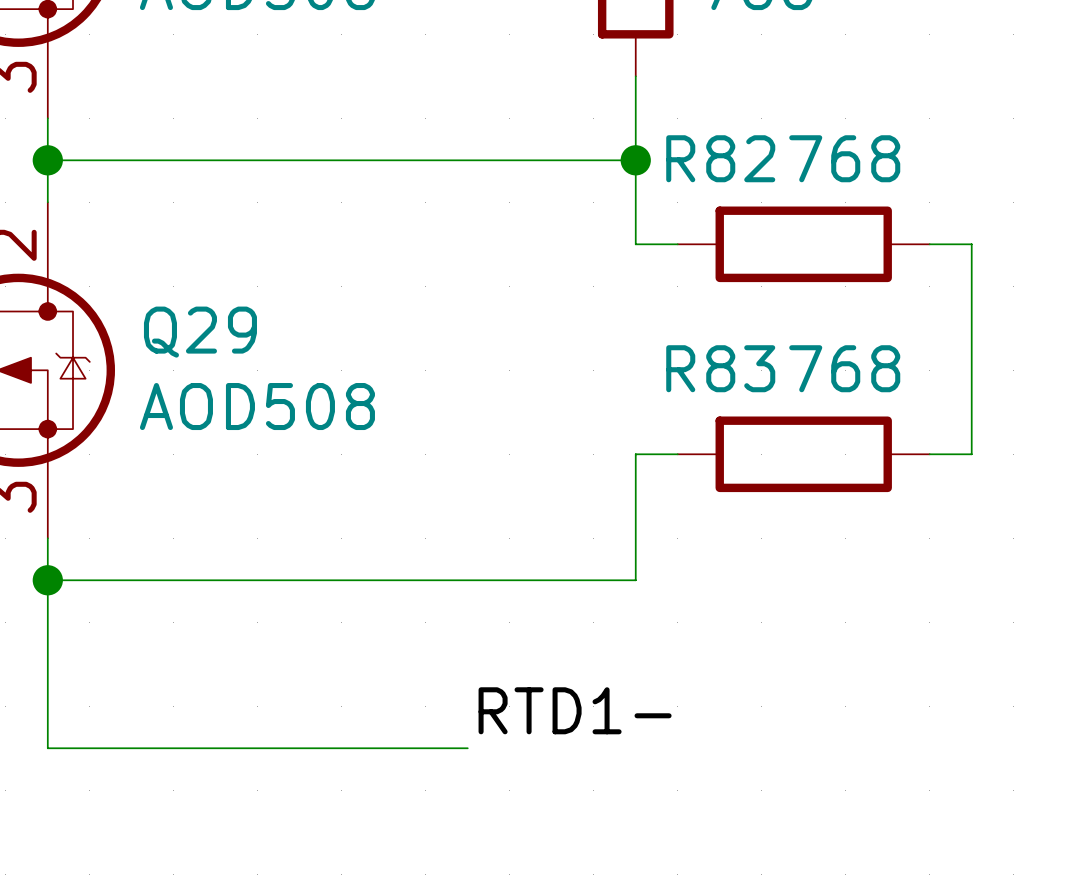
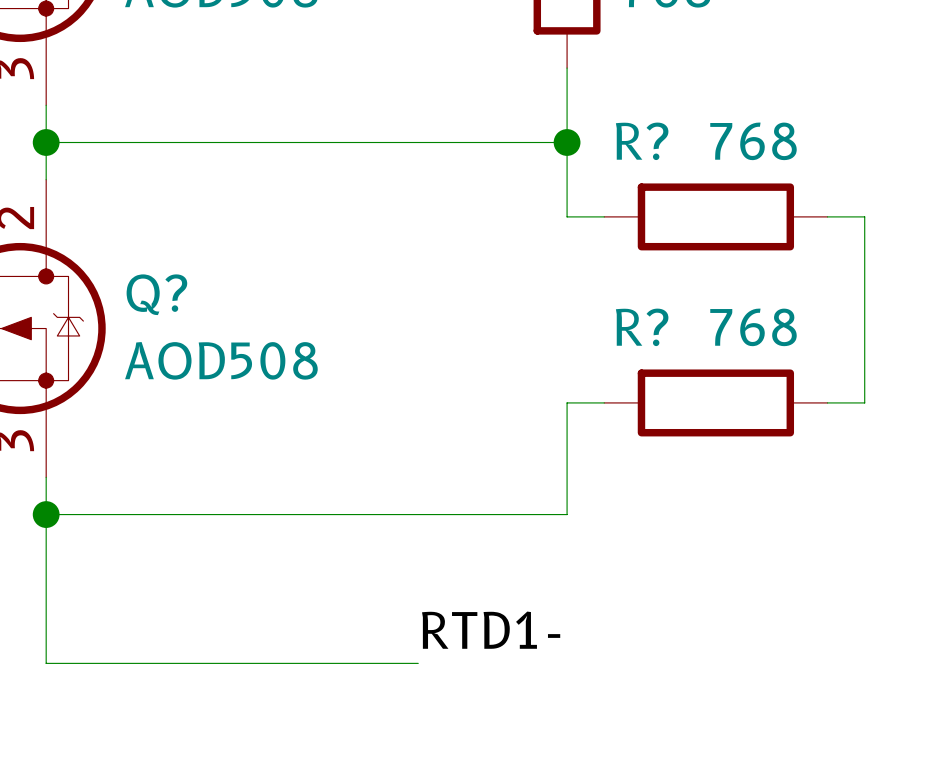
R82 name: R82 (720, 158) -> R? (642, 141)
Q29 name: Q29 (200, 332) -> Q? (156, 294)
R83 name: R83 (720, 368) -> R? (642, 327)

